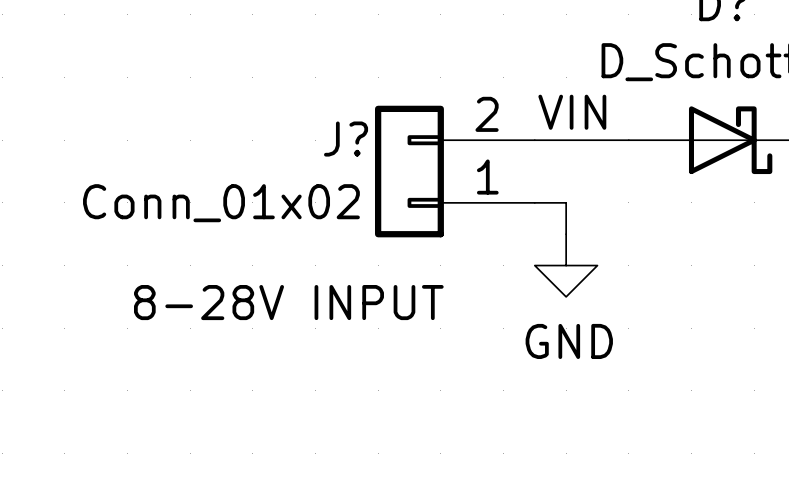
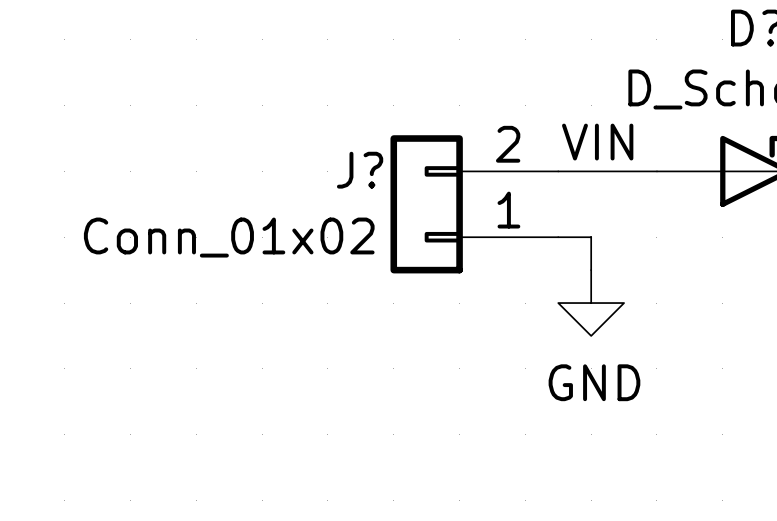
text: 8-28V INPUT (288, 302) -> none

